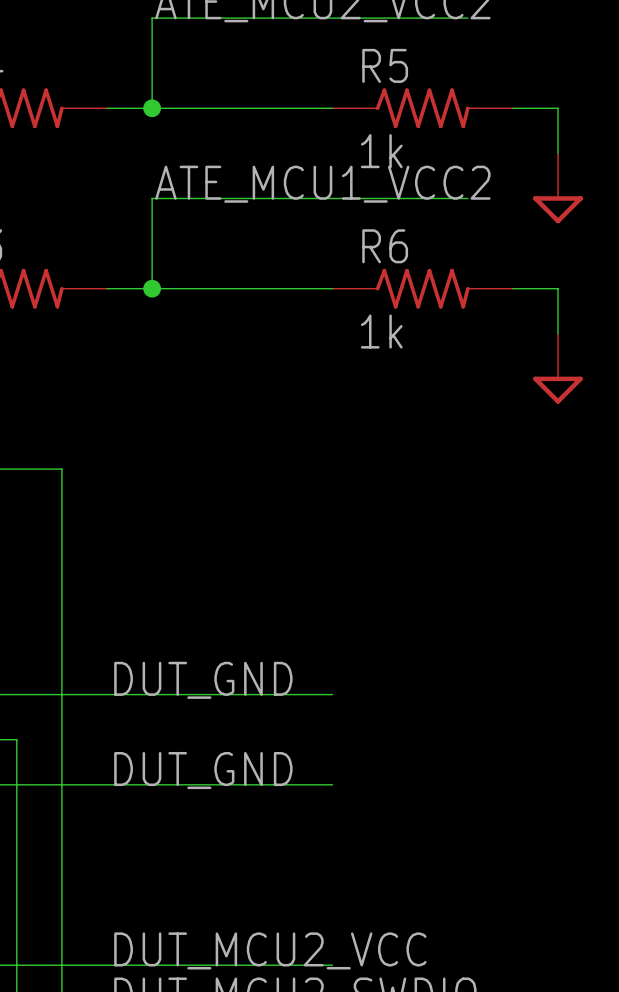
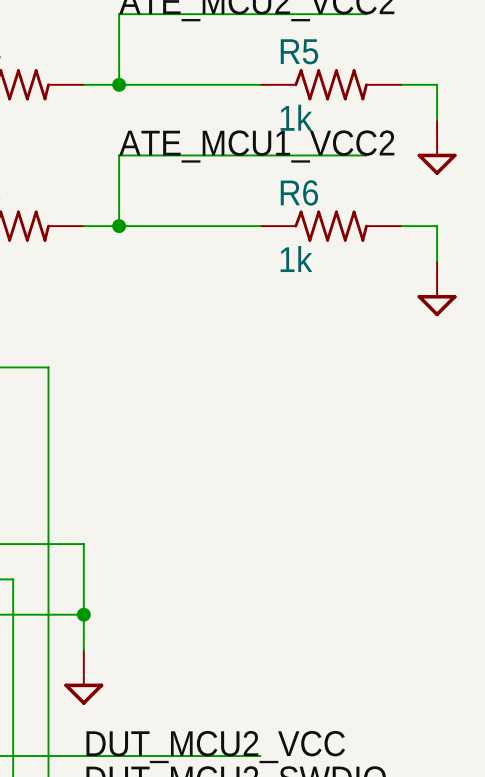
label: DUT_GND (203, 680) -> none
wire: (107, 694) (332, 694) -> (83, 544) (83, 650)
label: DUT_GND (203, 770) -> none
wire: (107, 784) (332, 784) -> none
junction: none -> (83, 614)
power symbol: none -> (83, 677)

